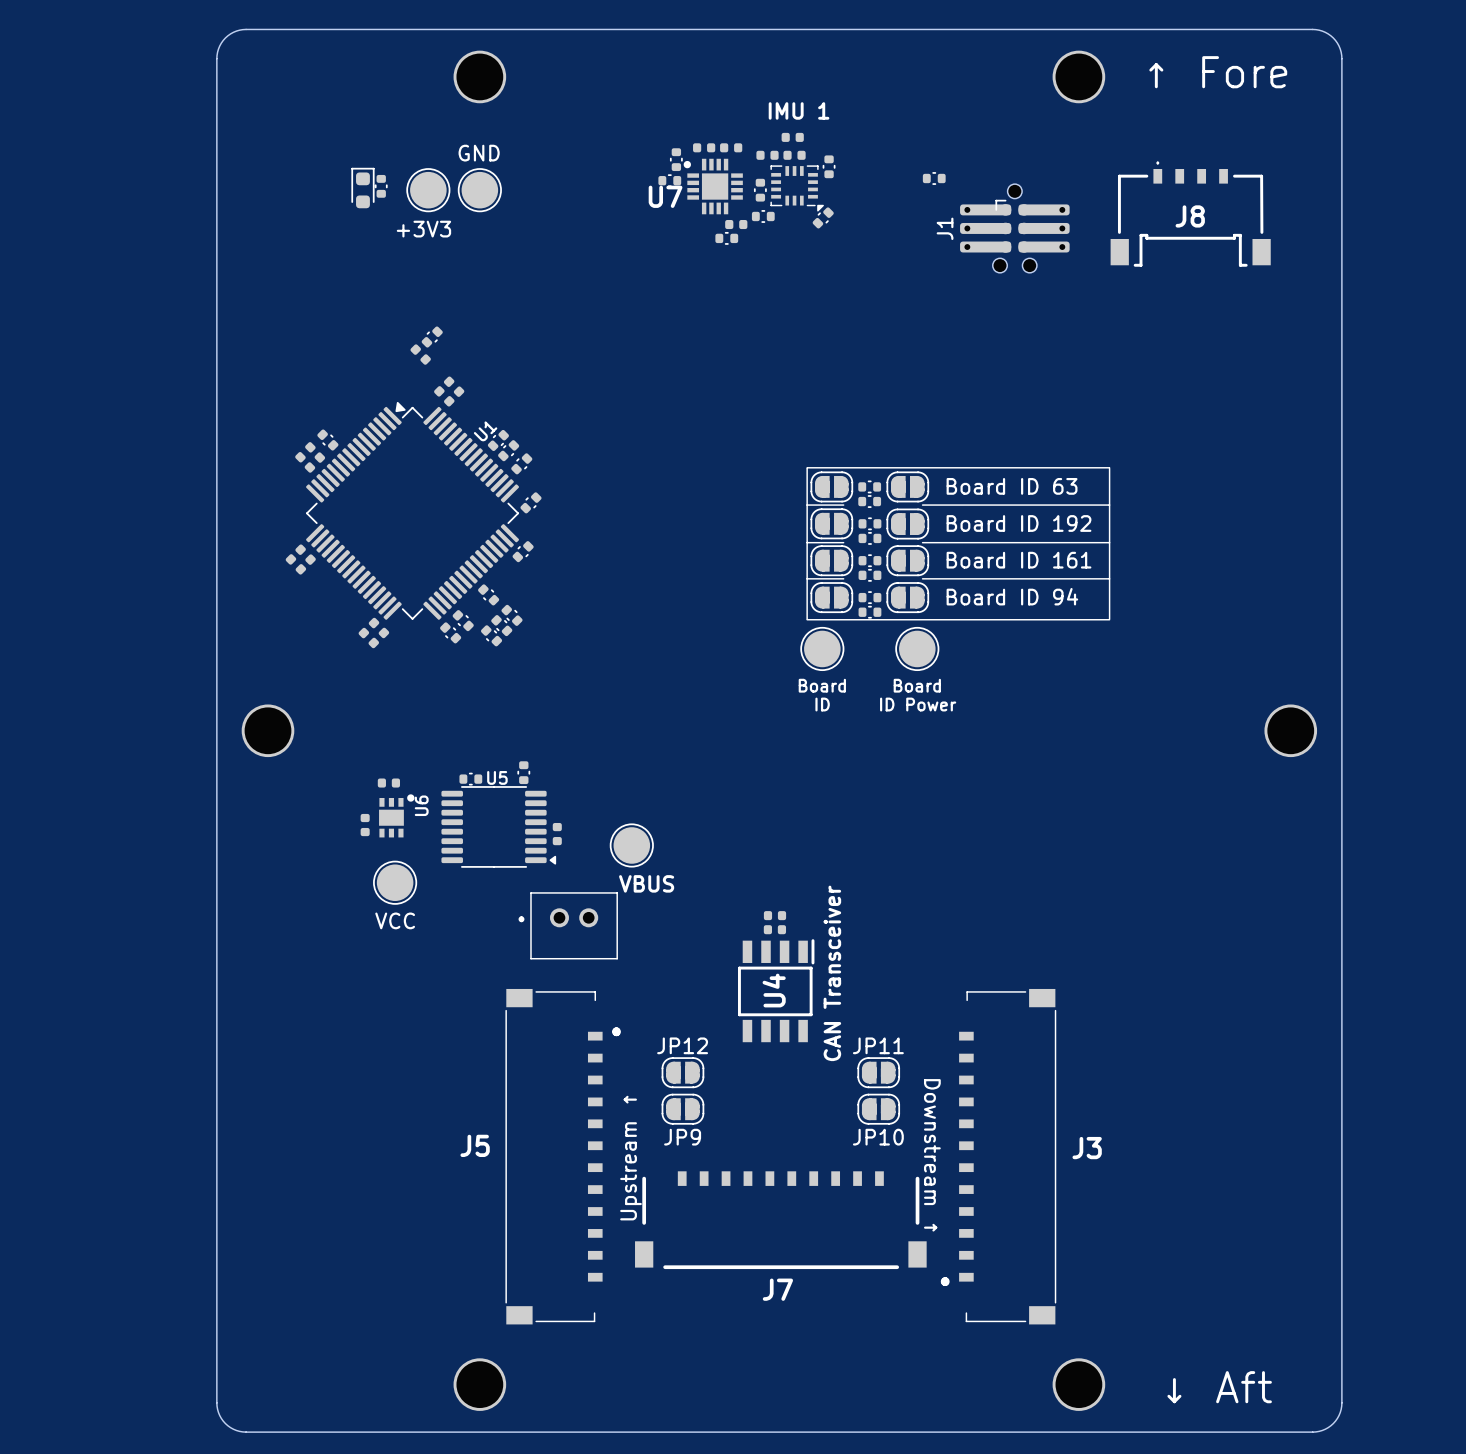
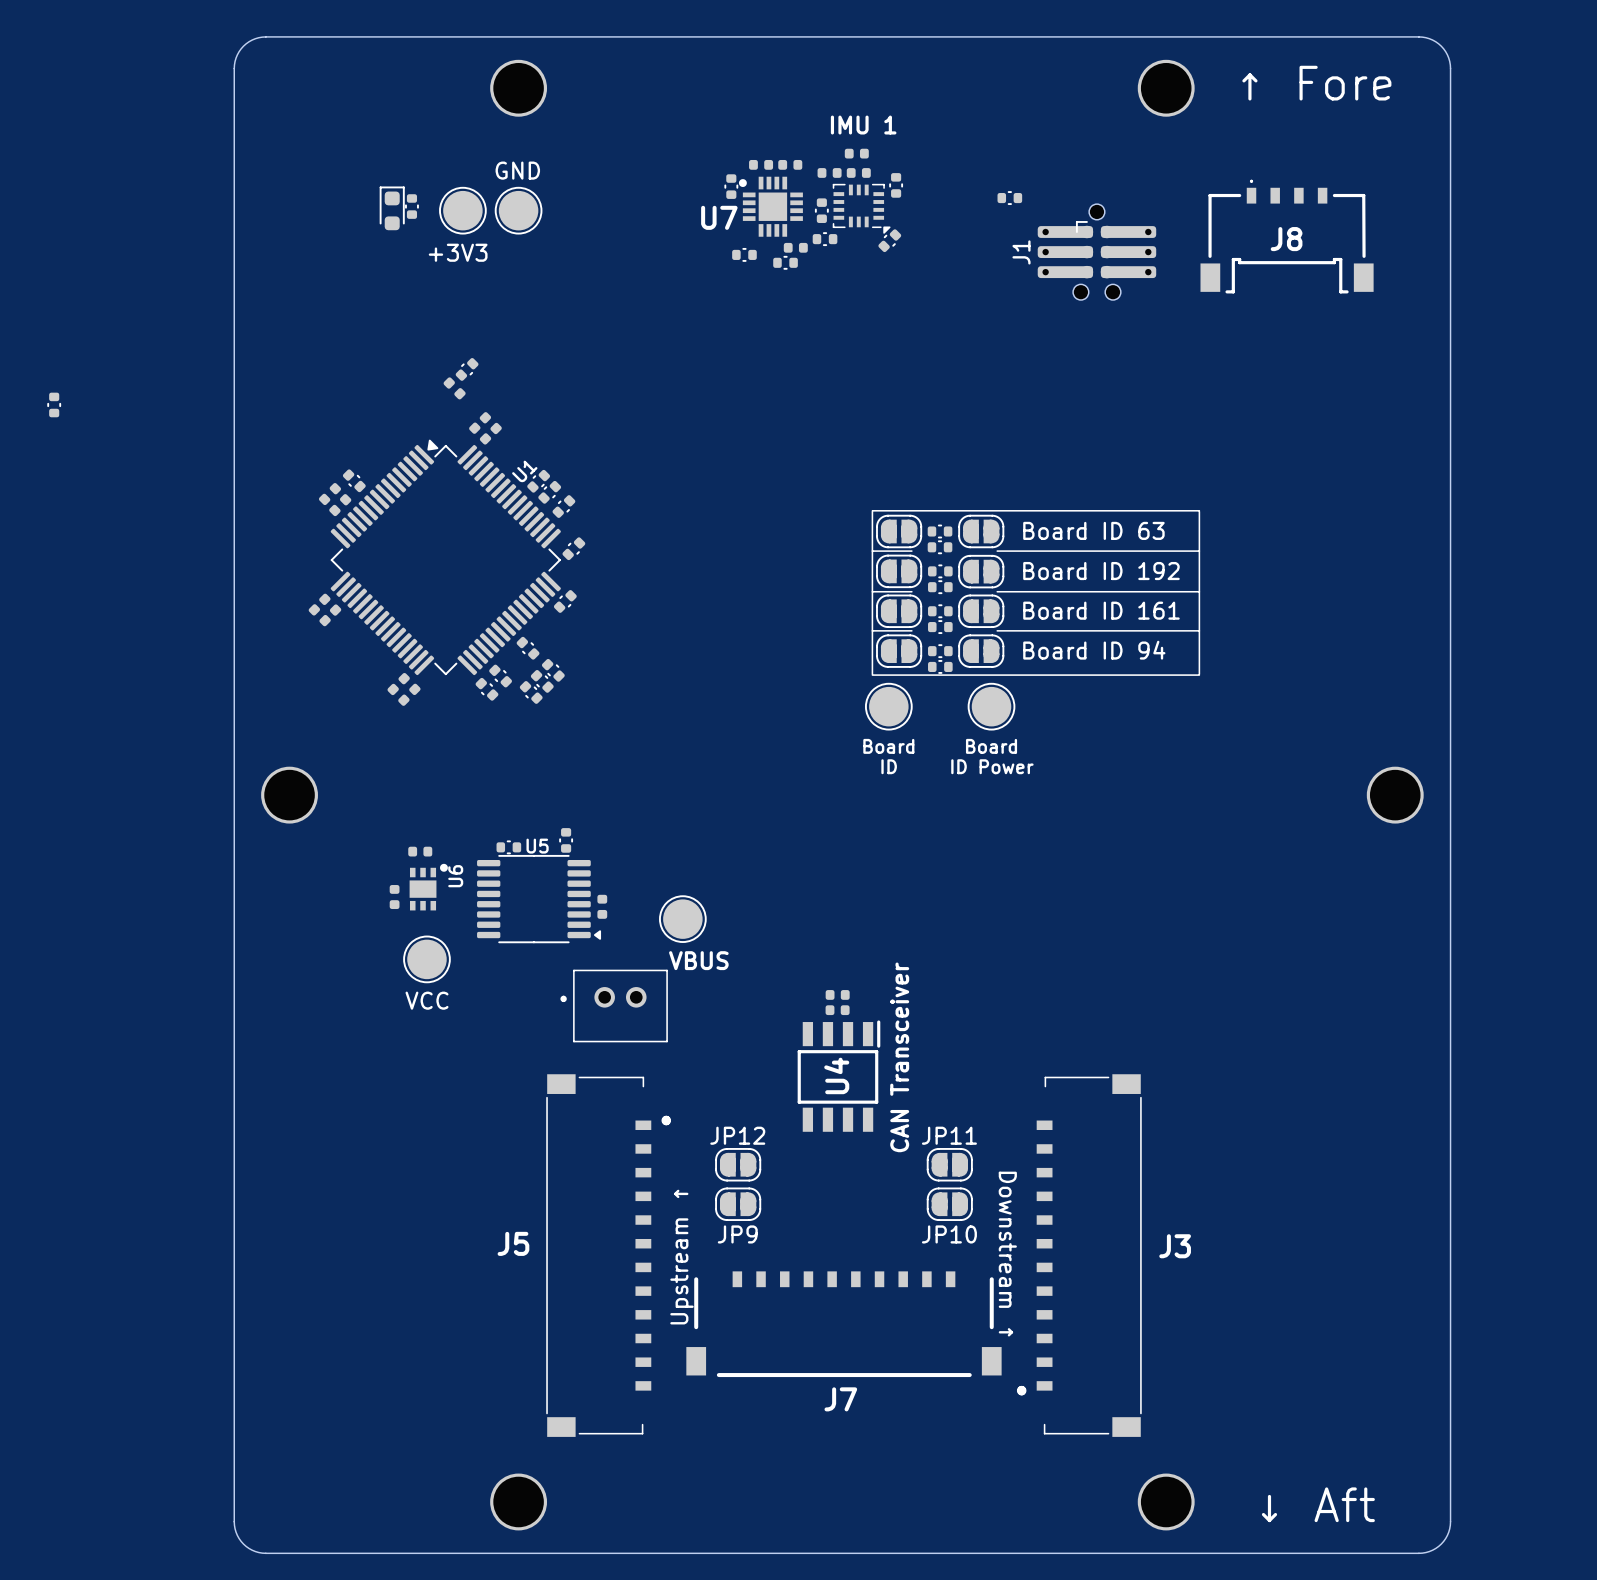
part: (676, 159) -> none
part: none -> (731, 186)
part: (669, 180) -> none
part: none -> (744, 254)
part: none -> (54, 404)

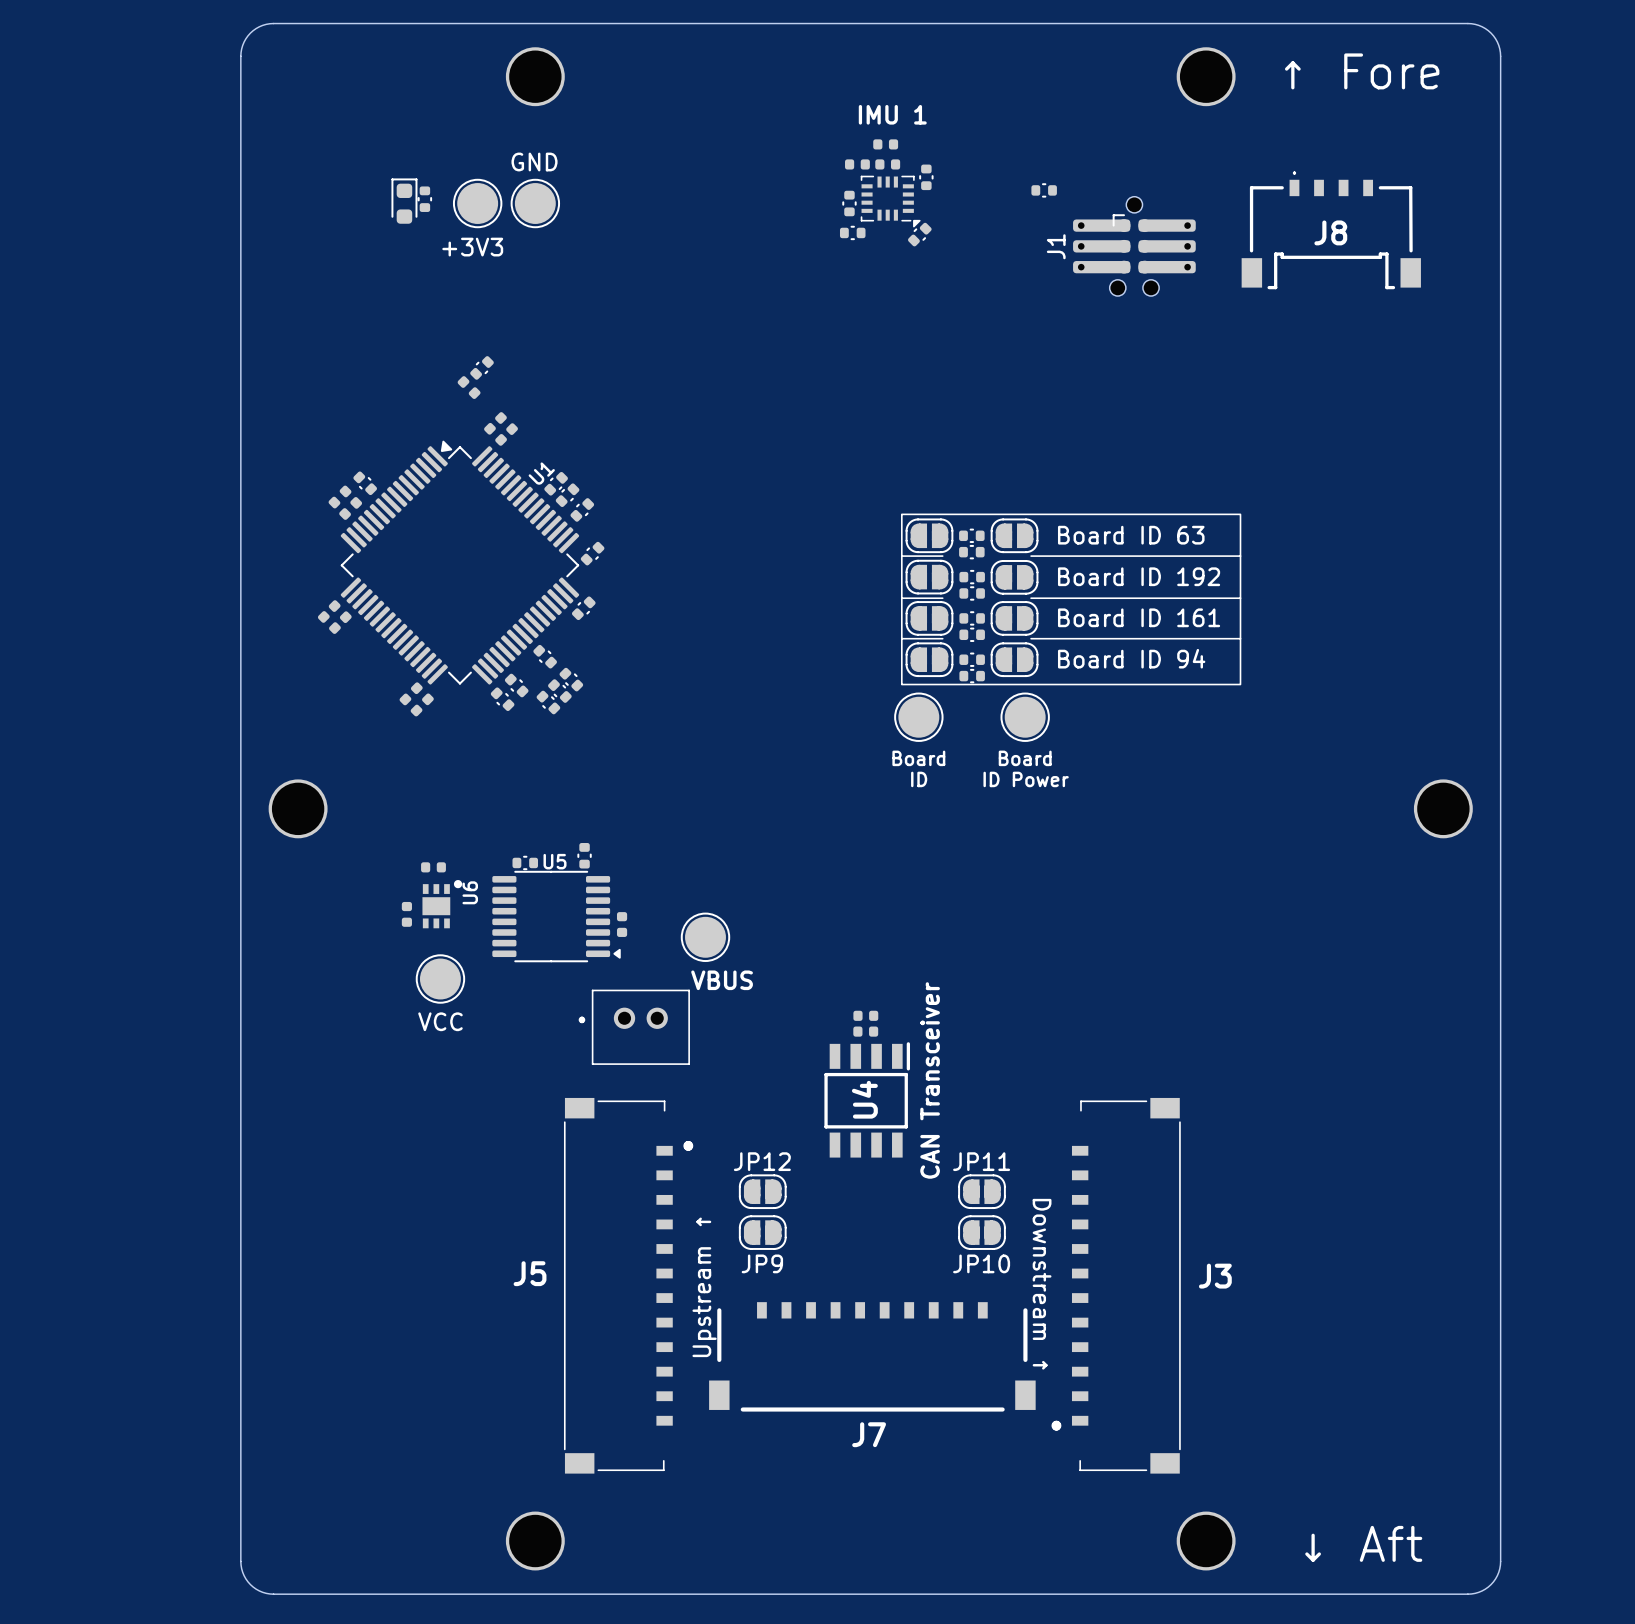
part: (761, 164) -> none
part: (790, 164) -> none
part: (731, 186) -> none
U7: (770, 206) -> none
part: (795, 247) -> none
part: (744, 254) -> none
part: (785, 262) -> none
part: (54, 404) -> none

